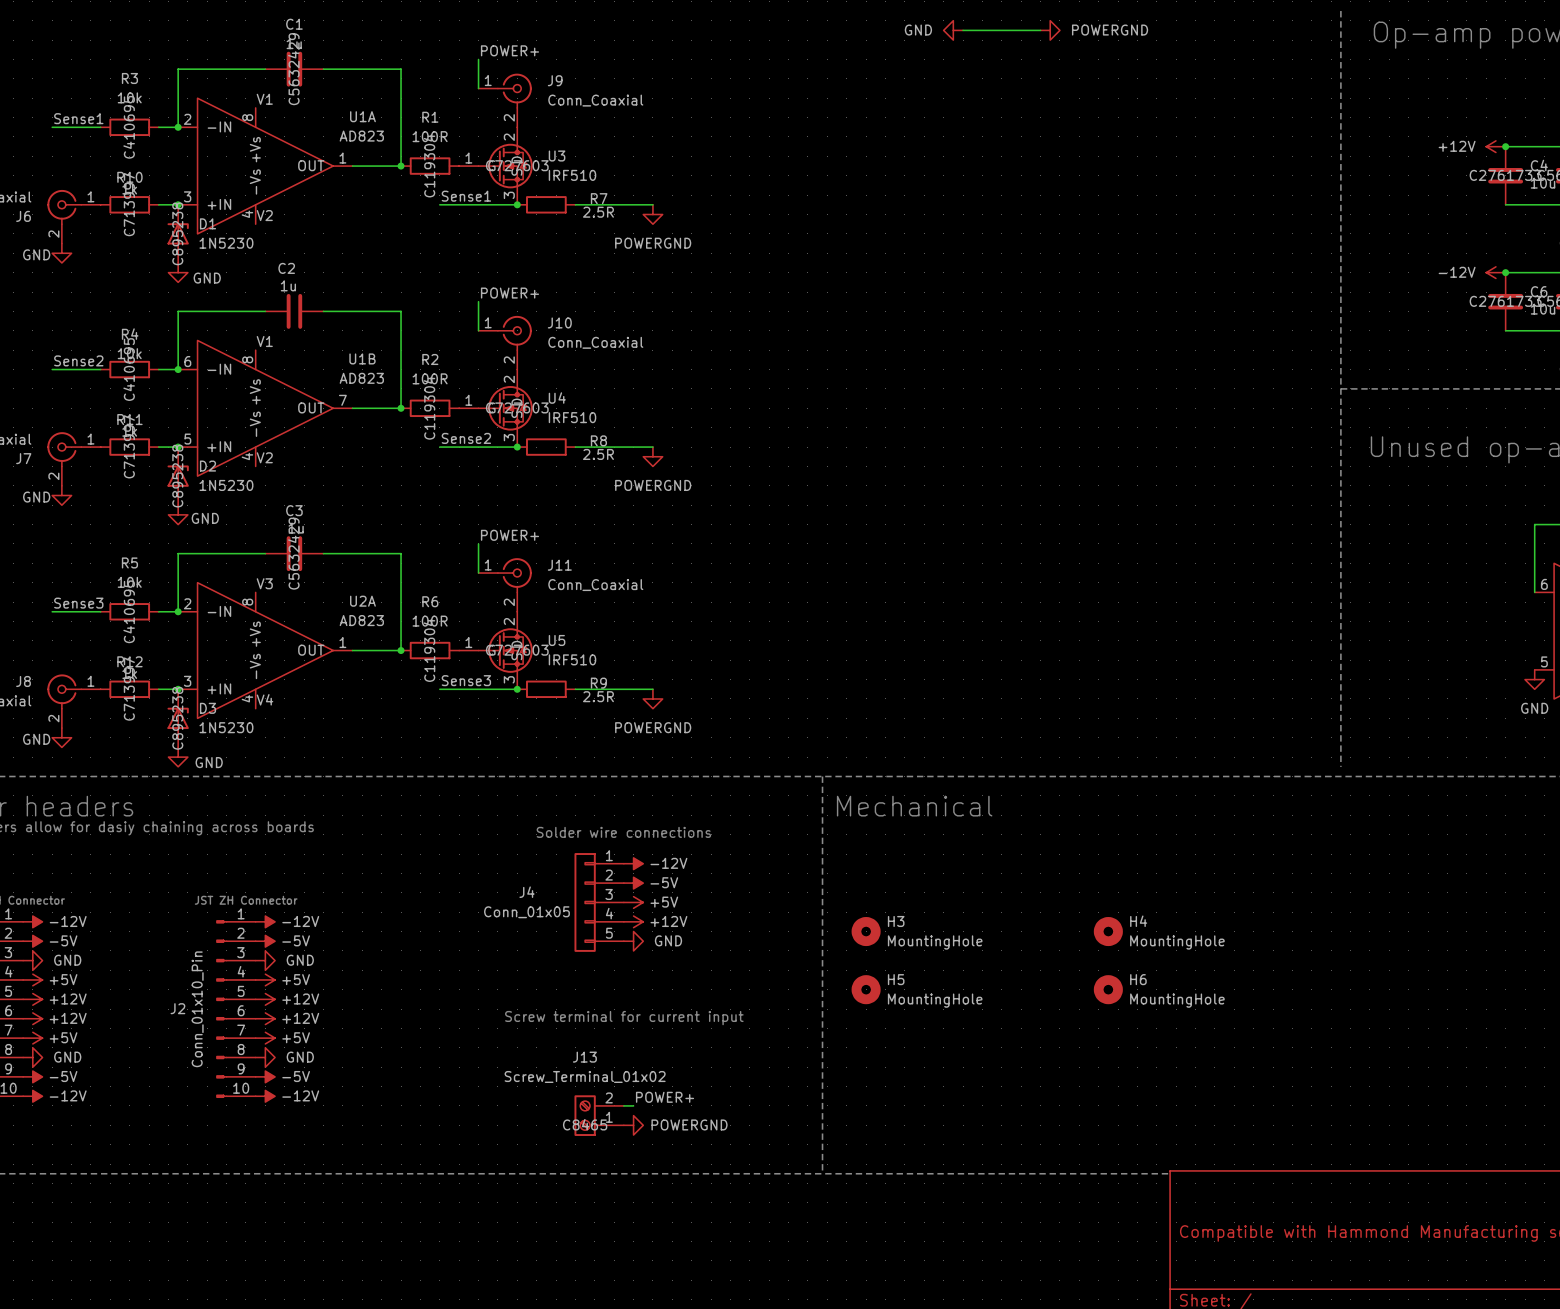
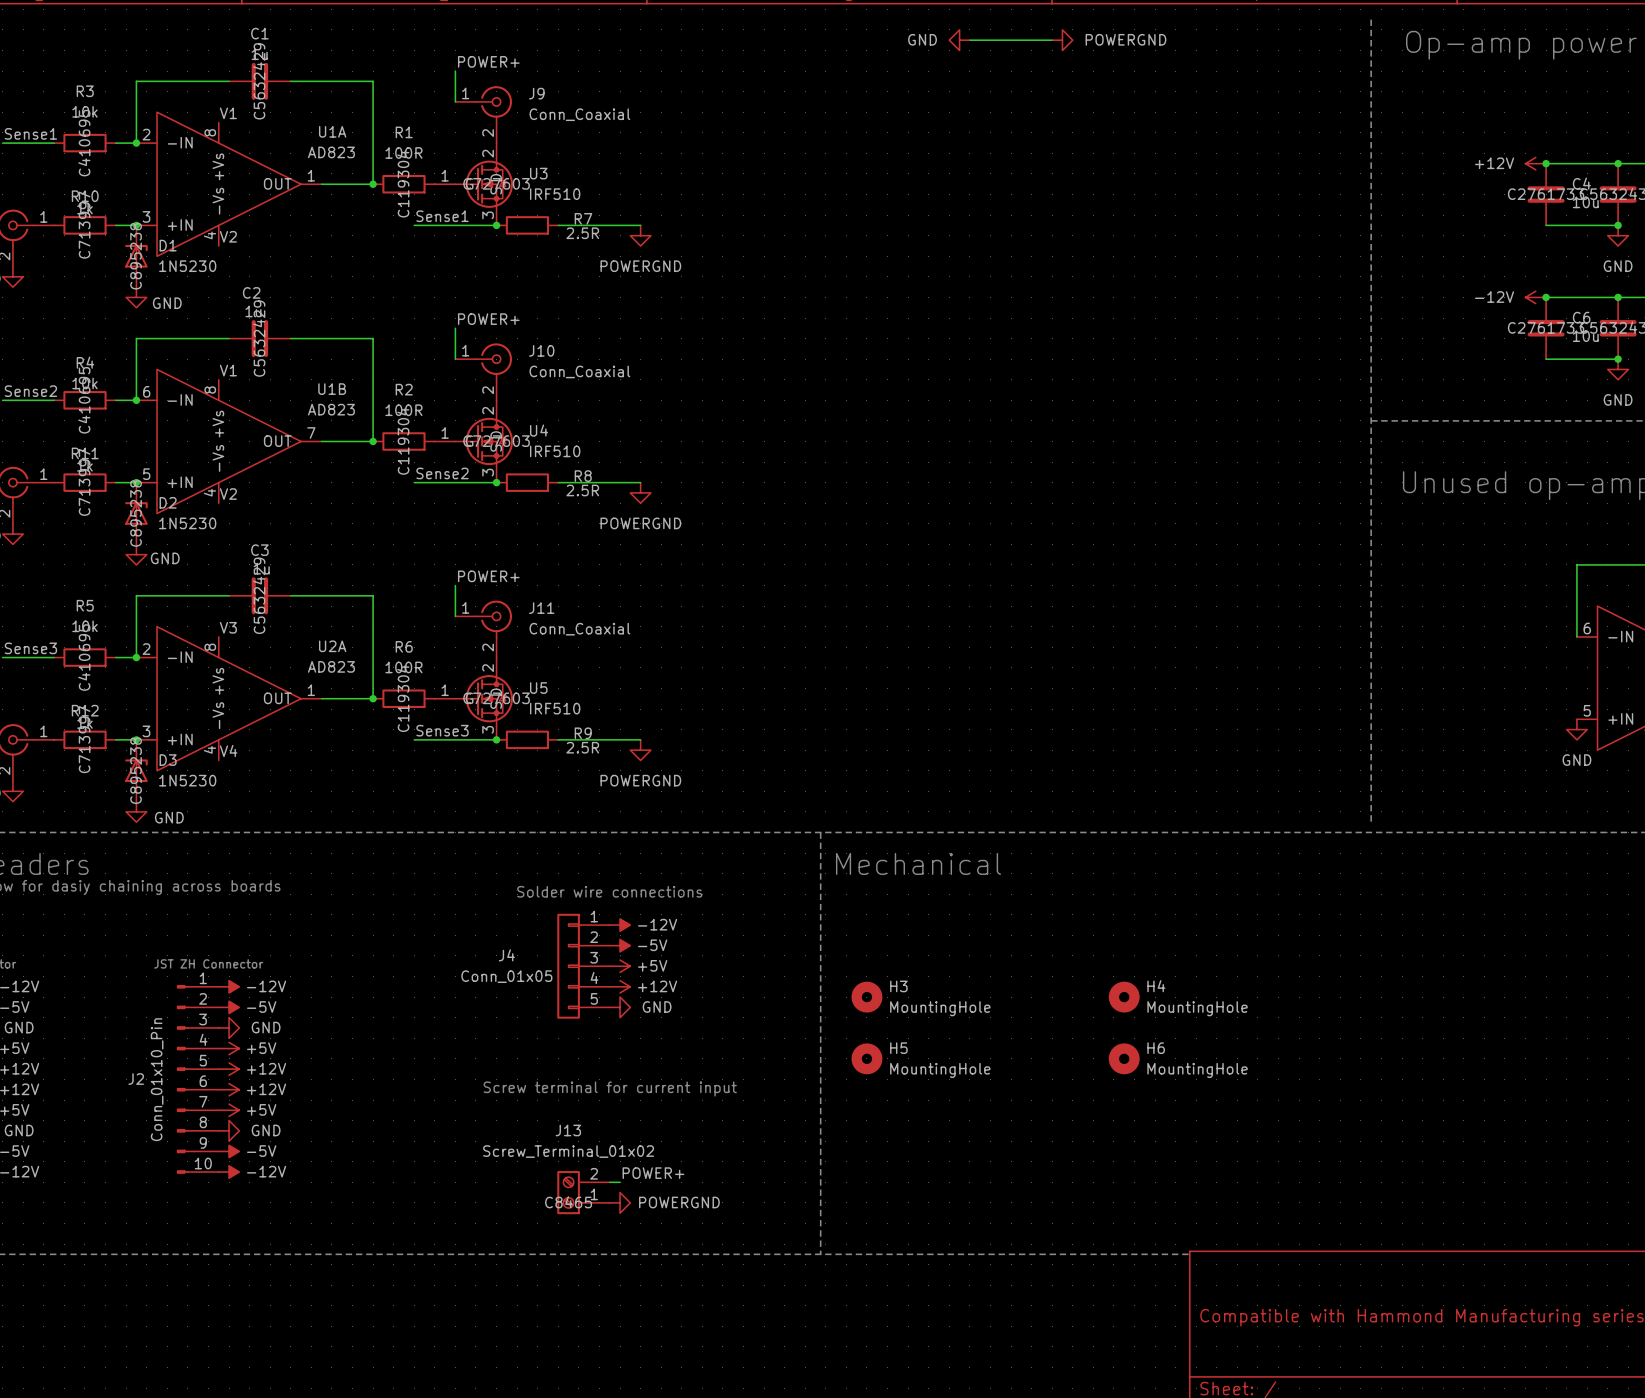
C2 text: none -> C5632429 (259, 338)

